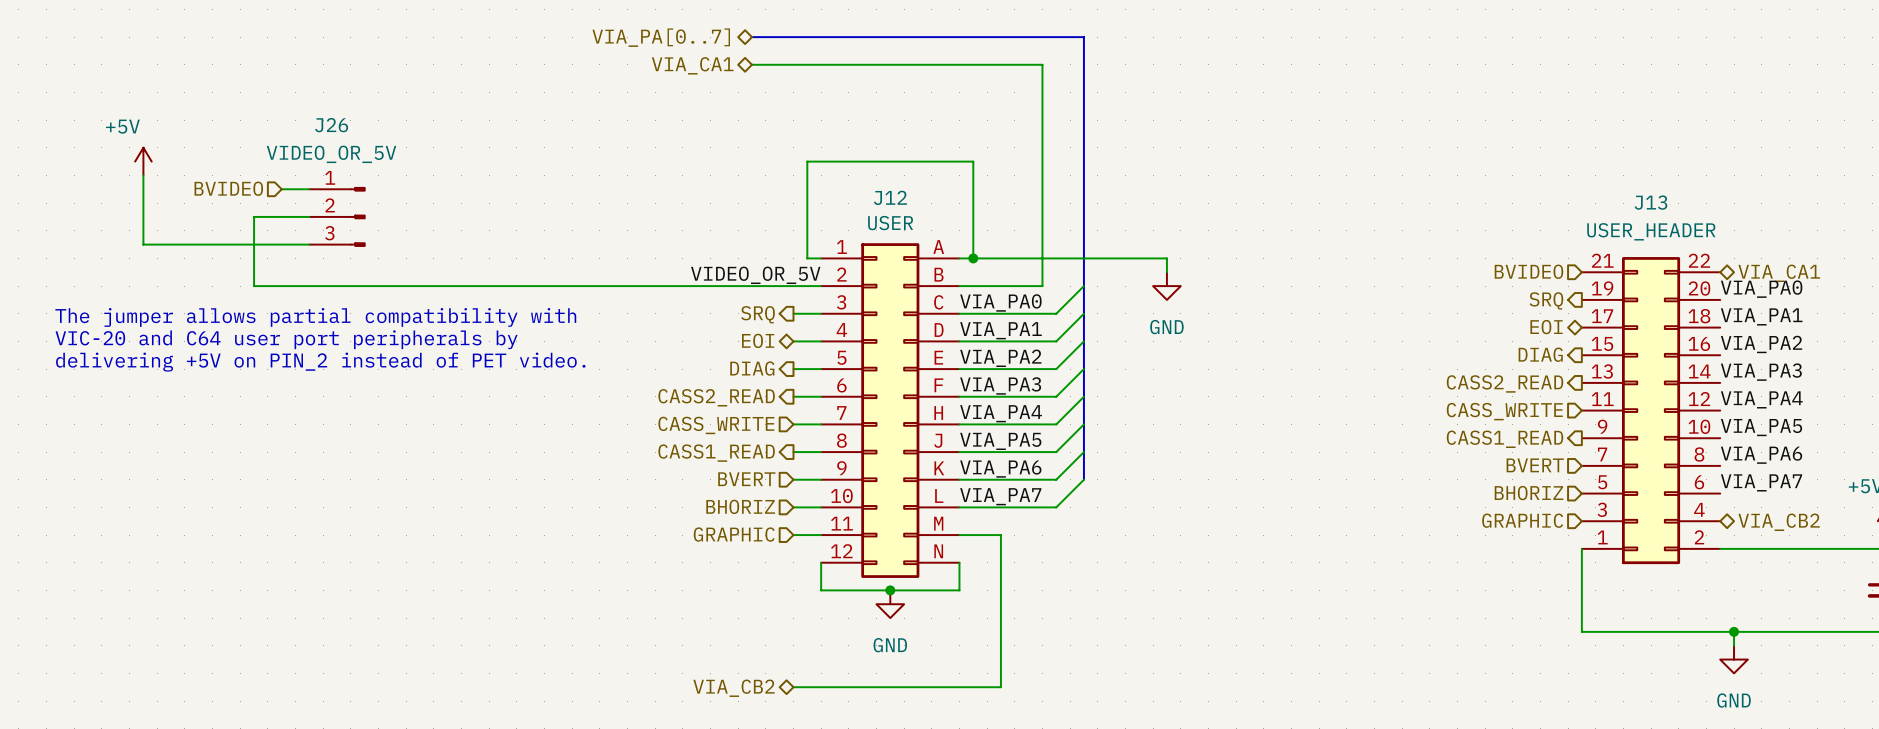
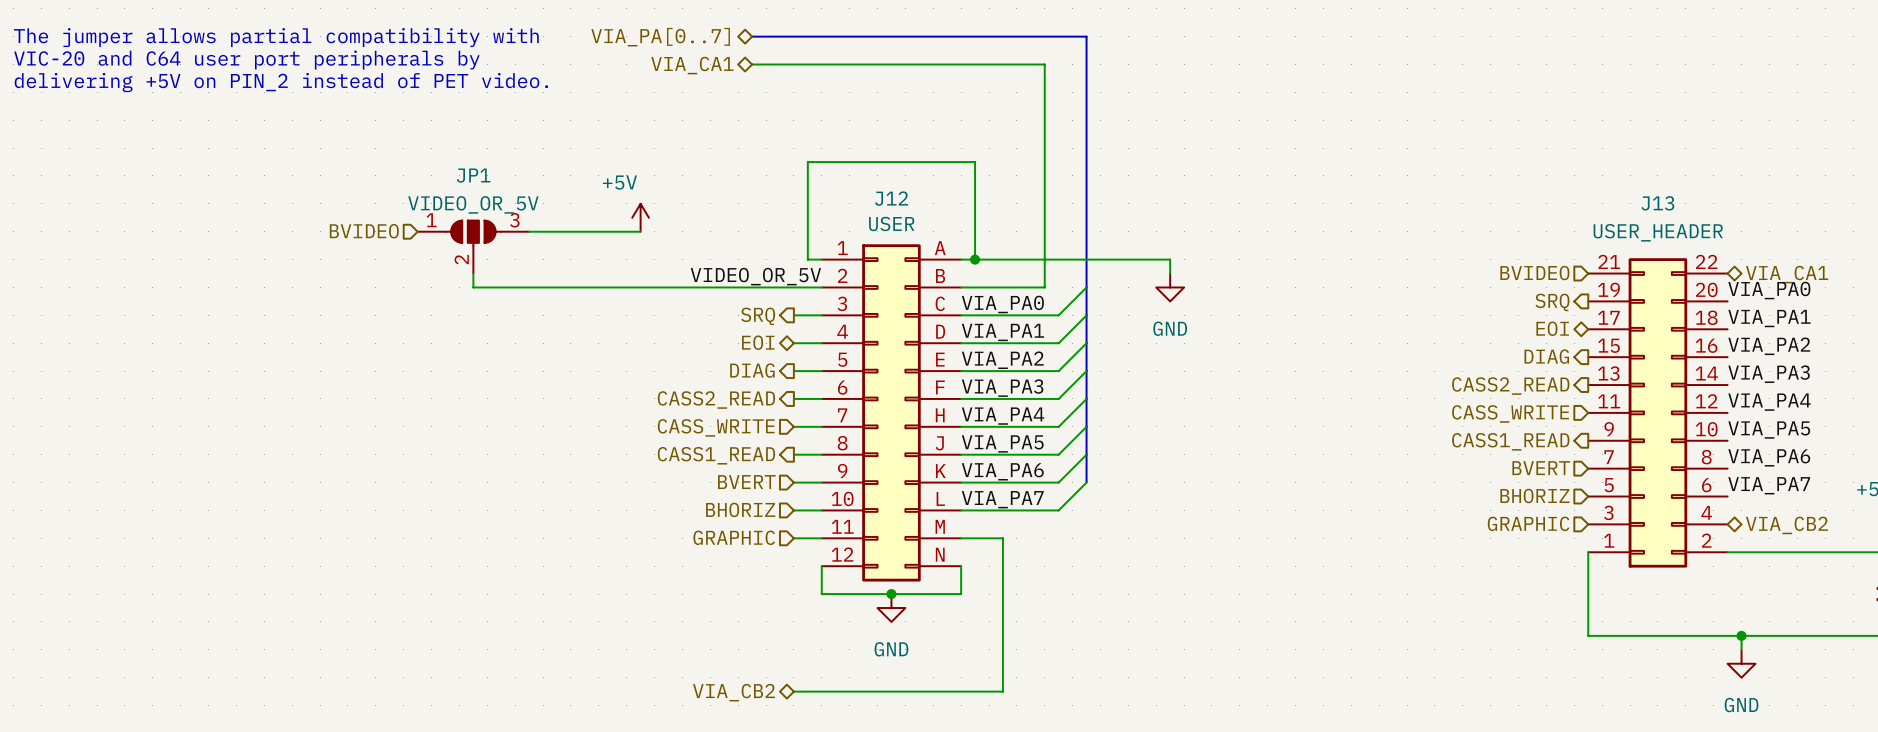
text: none -> The jumper allows partial compatibility with (276, 37)
text: none -> VIC-20 and C64 user port peripherals by (246, 60)
text: none -> delivering +5V on PIN_2 instead of PET video. (281, 82)
power symbol: +5V (143, 161) -> none
wire: (143, 175) (143, 244) (309, 244) -> none
hierarchical label position: BVIDEO (228, 188) -> BVIDEO (364, 231)
wire: (281, 189) (309, 189) -> none
wire: (309, 216) (254, 216) (254, 286) (475, 286) -> (473, 273) (473, 287)
J26: VIDEO_OR_5V (337, 216) -> none
power symbol: none -> +5V (640, 217)
wire: none -> (529, 231) (640, 231)
JP1: none -> VIDEO_OR_5V (473, 247)
text: The jumper allows partial compatibility with (315, 317) -> none
text: VIC-20 and C64 user port peripherals by (286, 339) -> none
text: delivering +5V on PIN_2 instead of PET video. (320, 362) -> none

